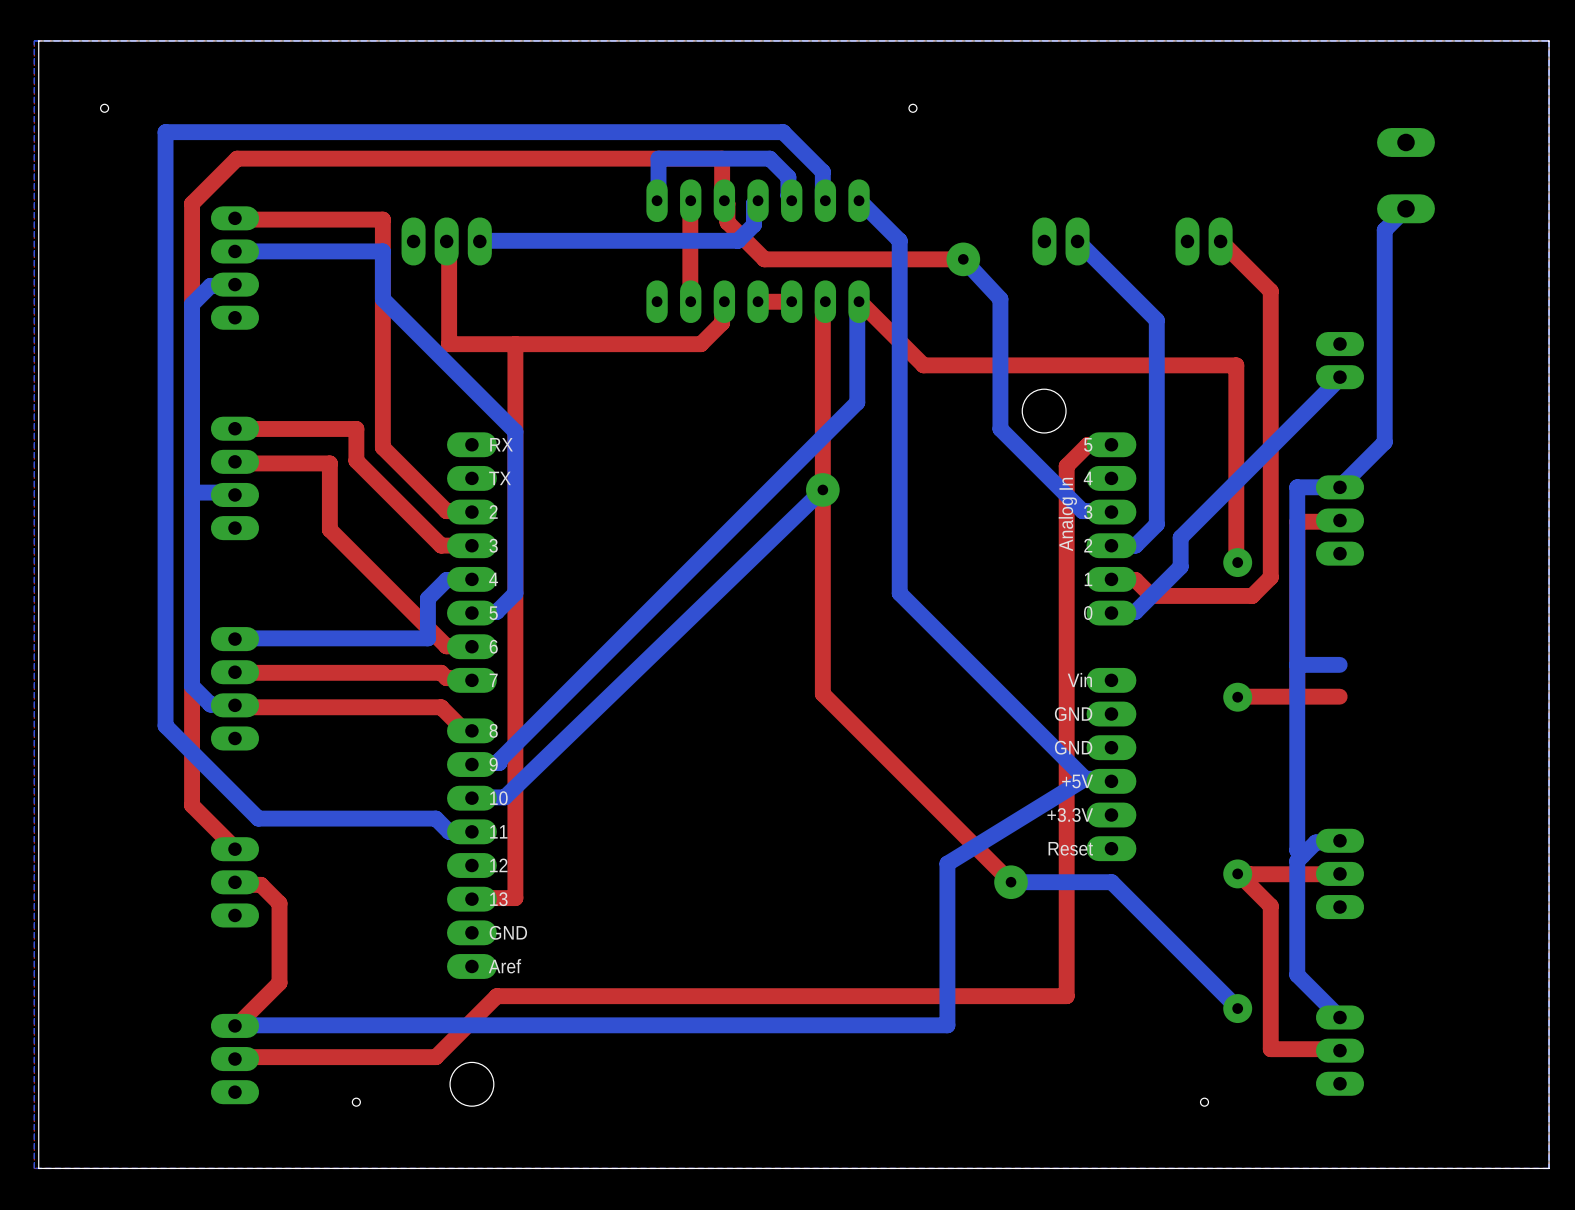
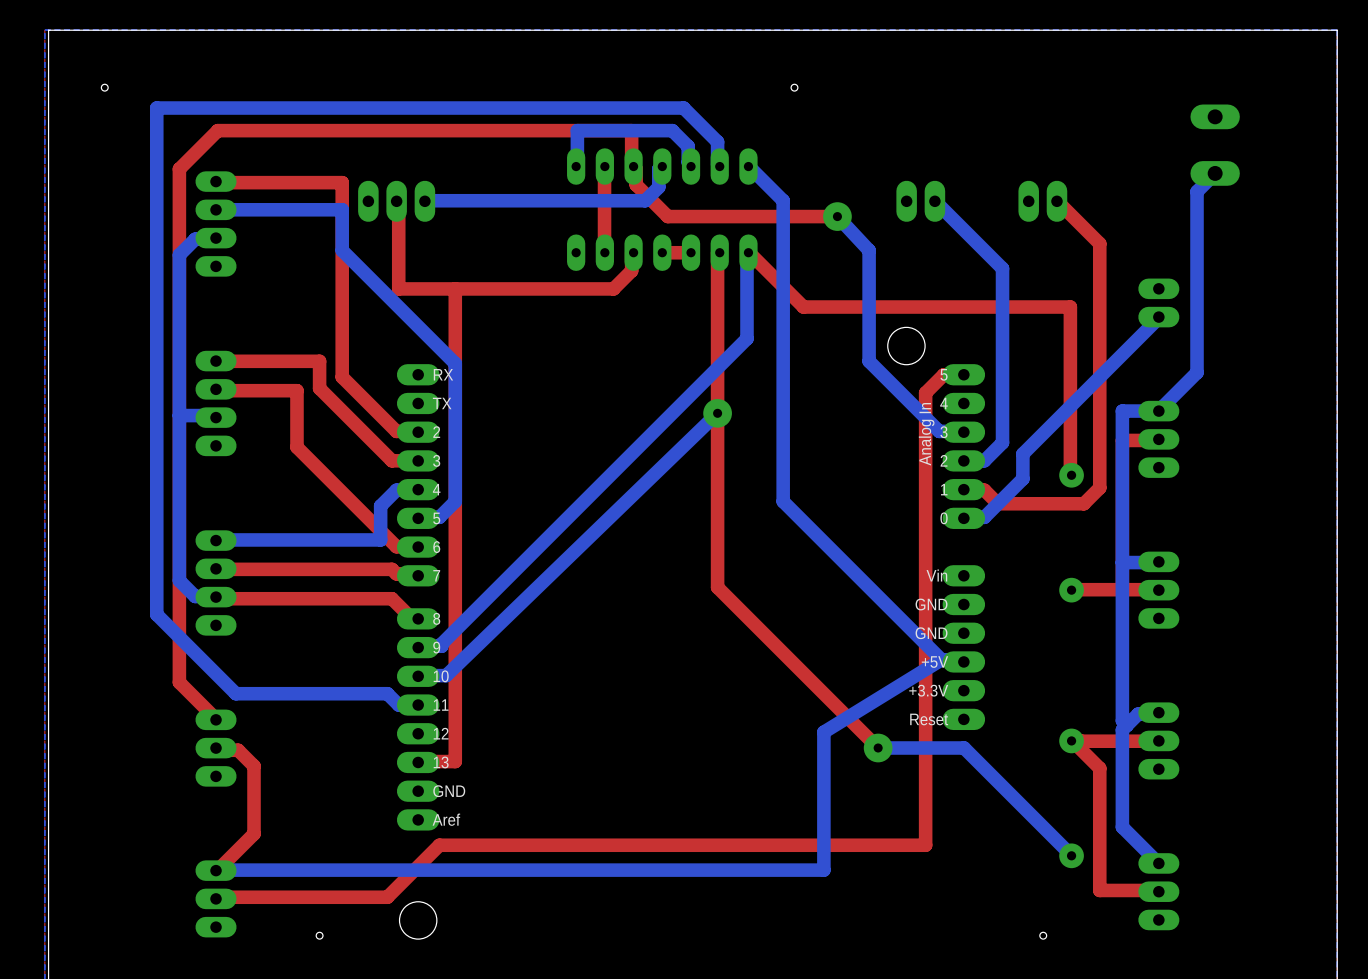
part: none -> (1158, 590)

